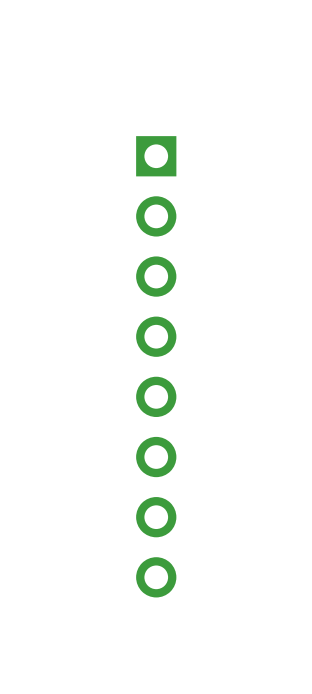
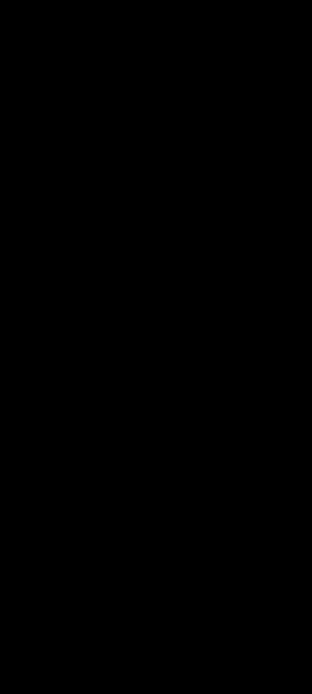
part: (156, 366) -> none

